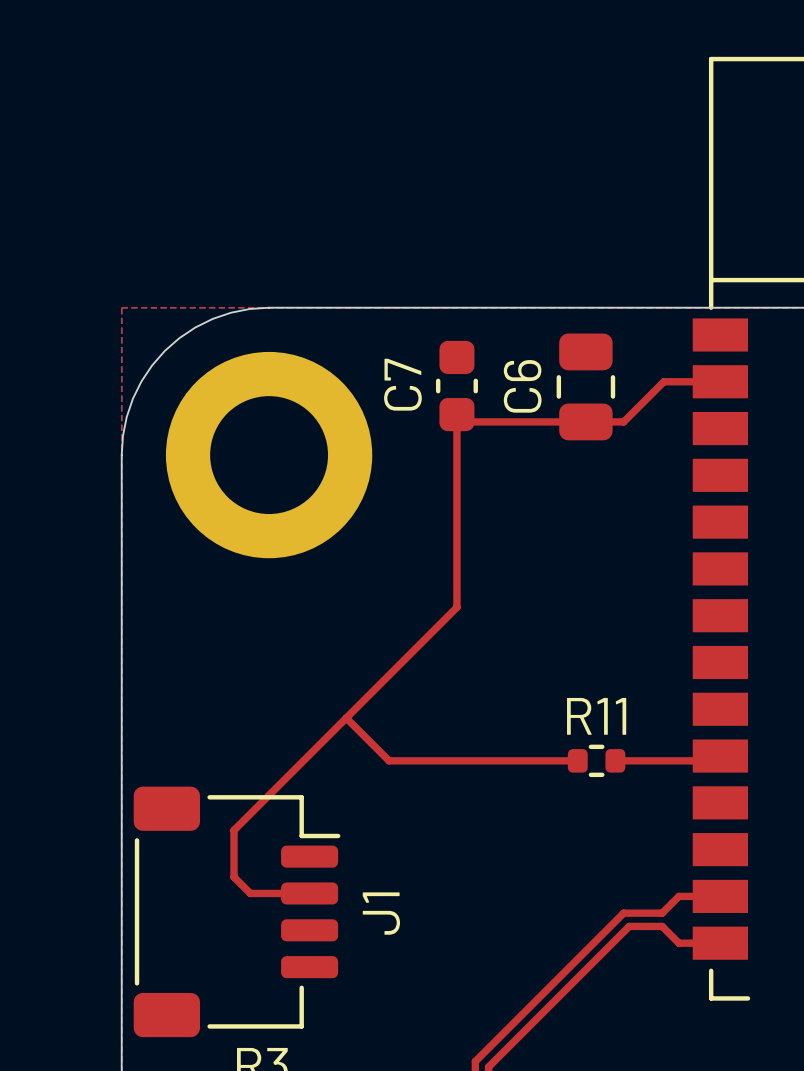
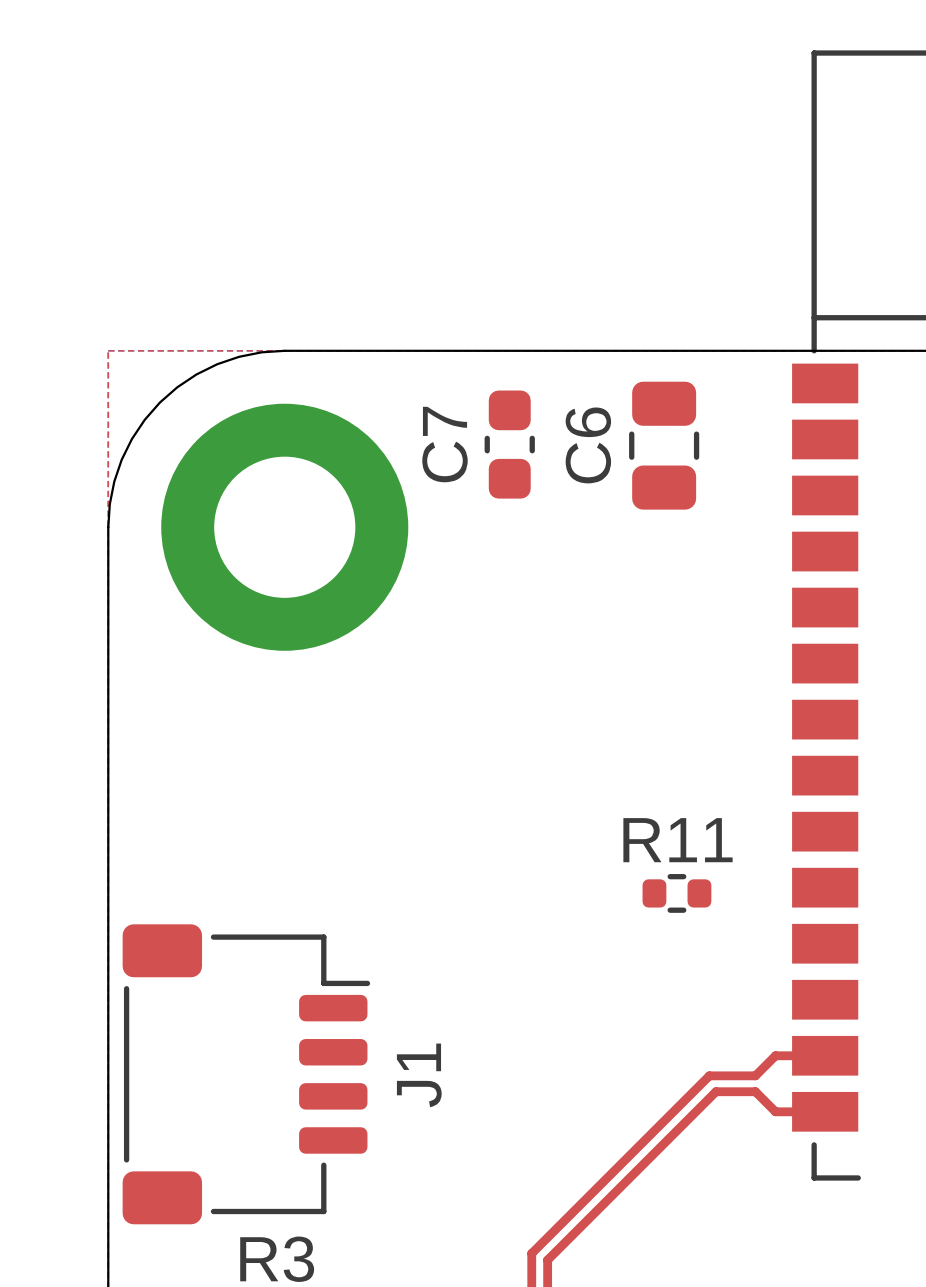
top track: (720, 381) (663, 381) (623, 421) (464, 421) (456, 414) (456, 607) (234, 830) (234, 877) (250, 893) (309, 893) -> none
top track: (346, 718) (389, 760) (577, 760) -> none
top track: (720, 756) (715, 760) (615, 760) -> none

